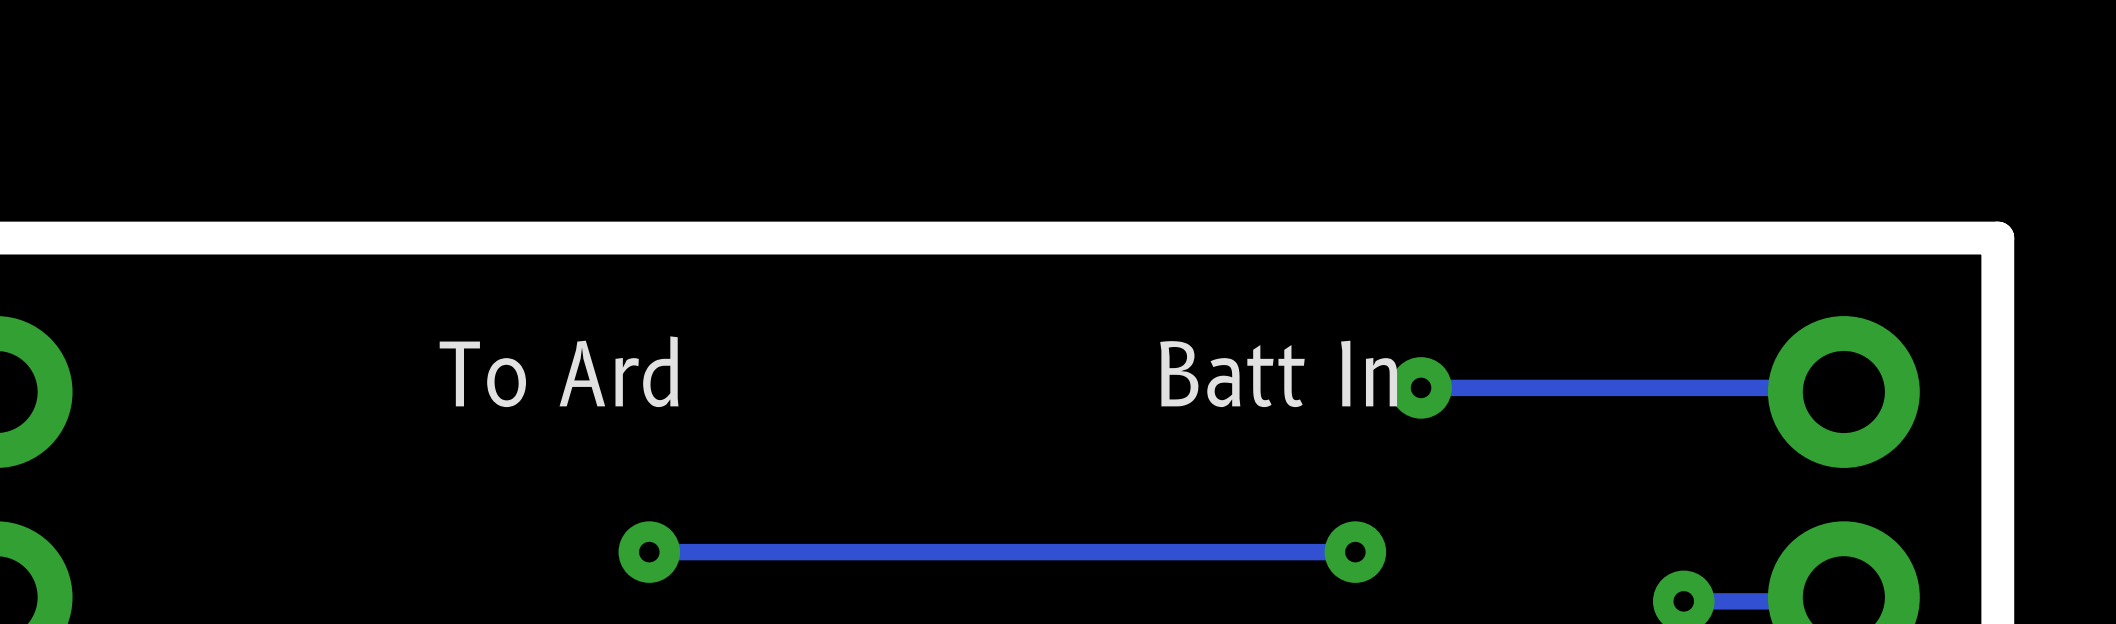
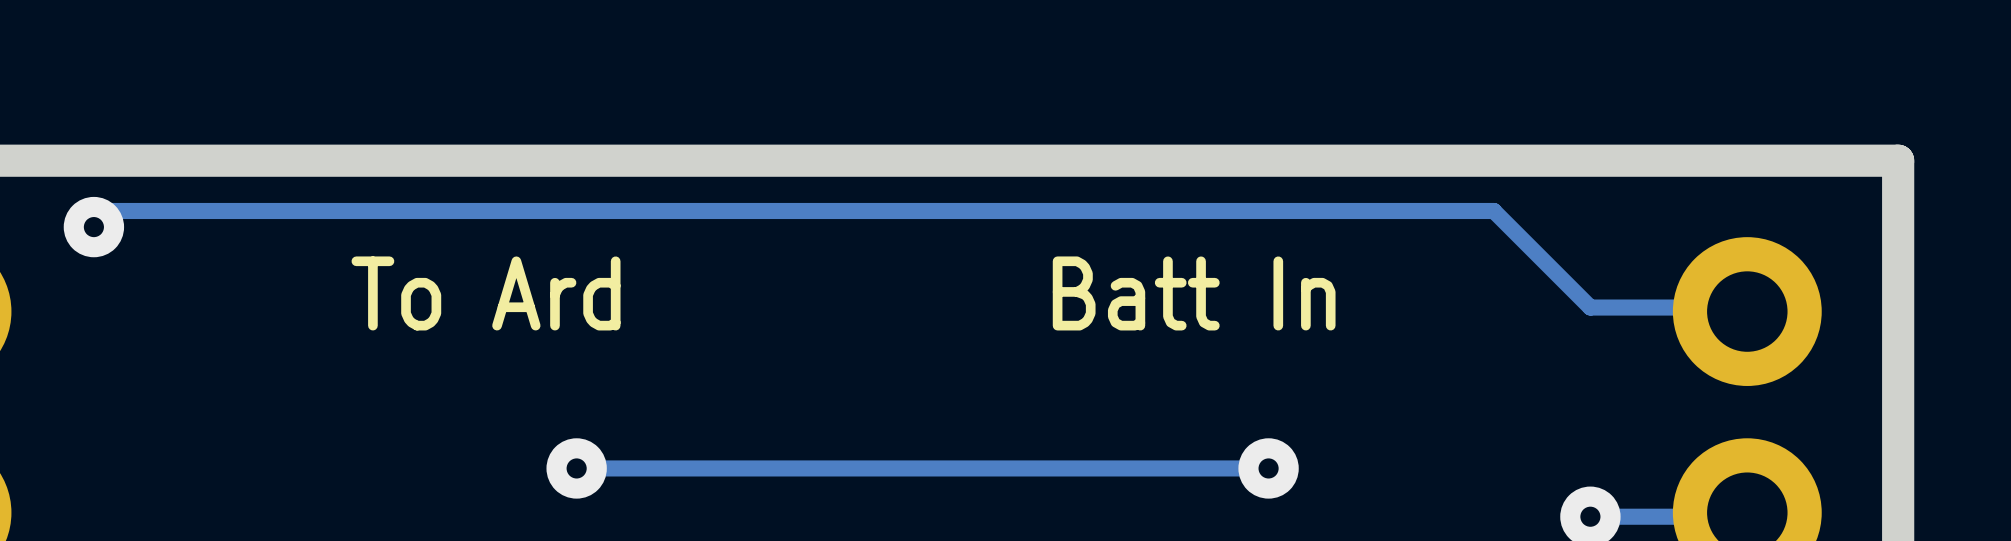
via: none -> (93, 227)
via: (1421, 387) -> none
track: (1683, 387) (1421, 387) -> (1590, 307) (1493, 210) (109, 210) (93, 227)

